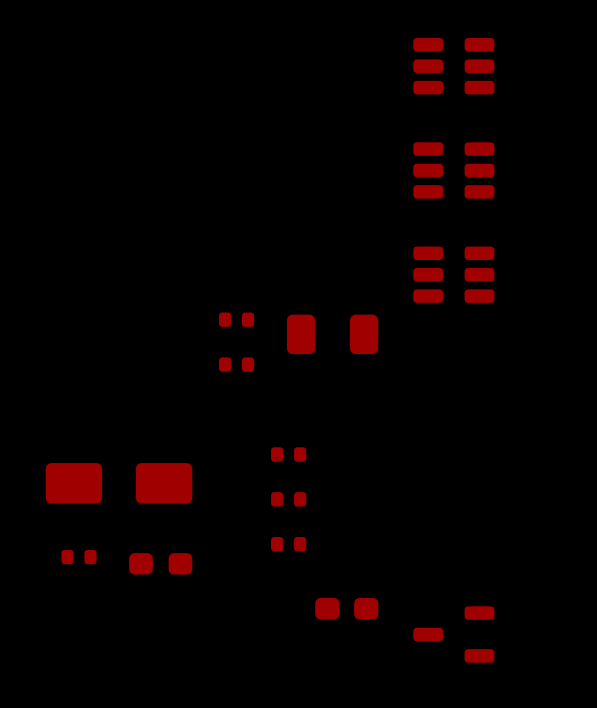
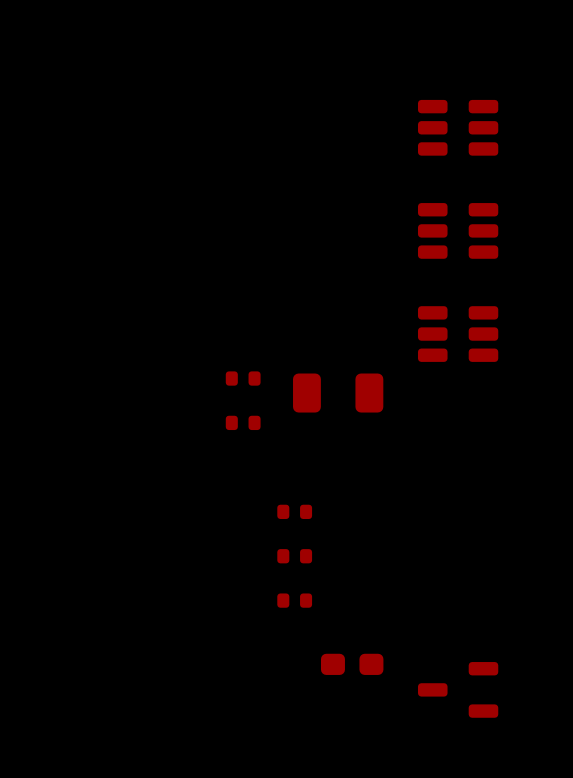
part: (119, 483) -> none
part: (79, 557) -> none
part: (160, 563) -> none

